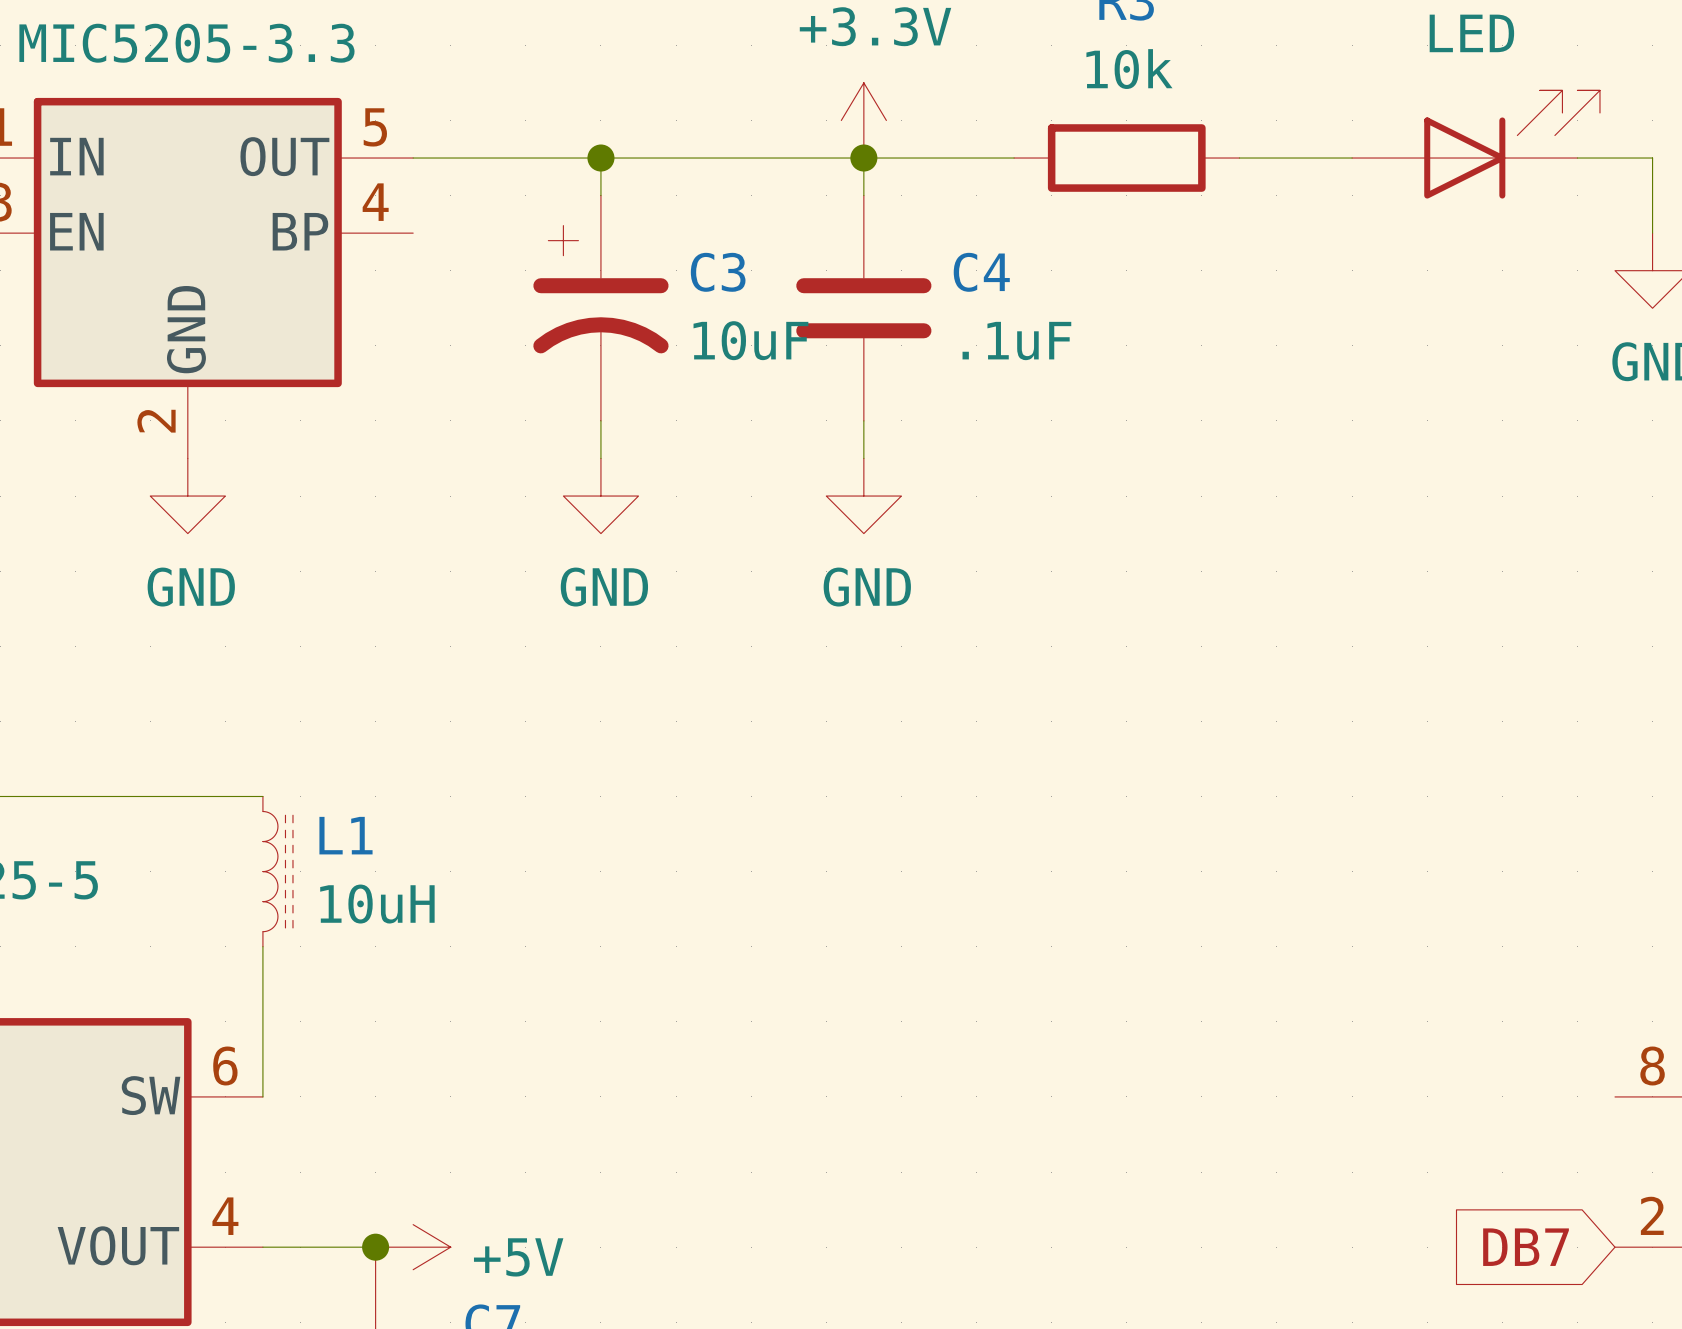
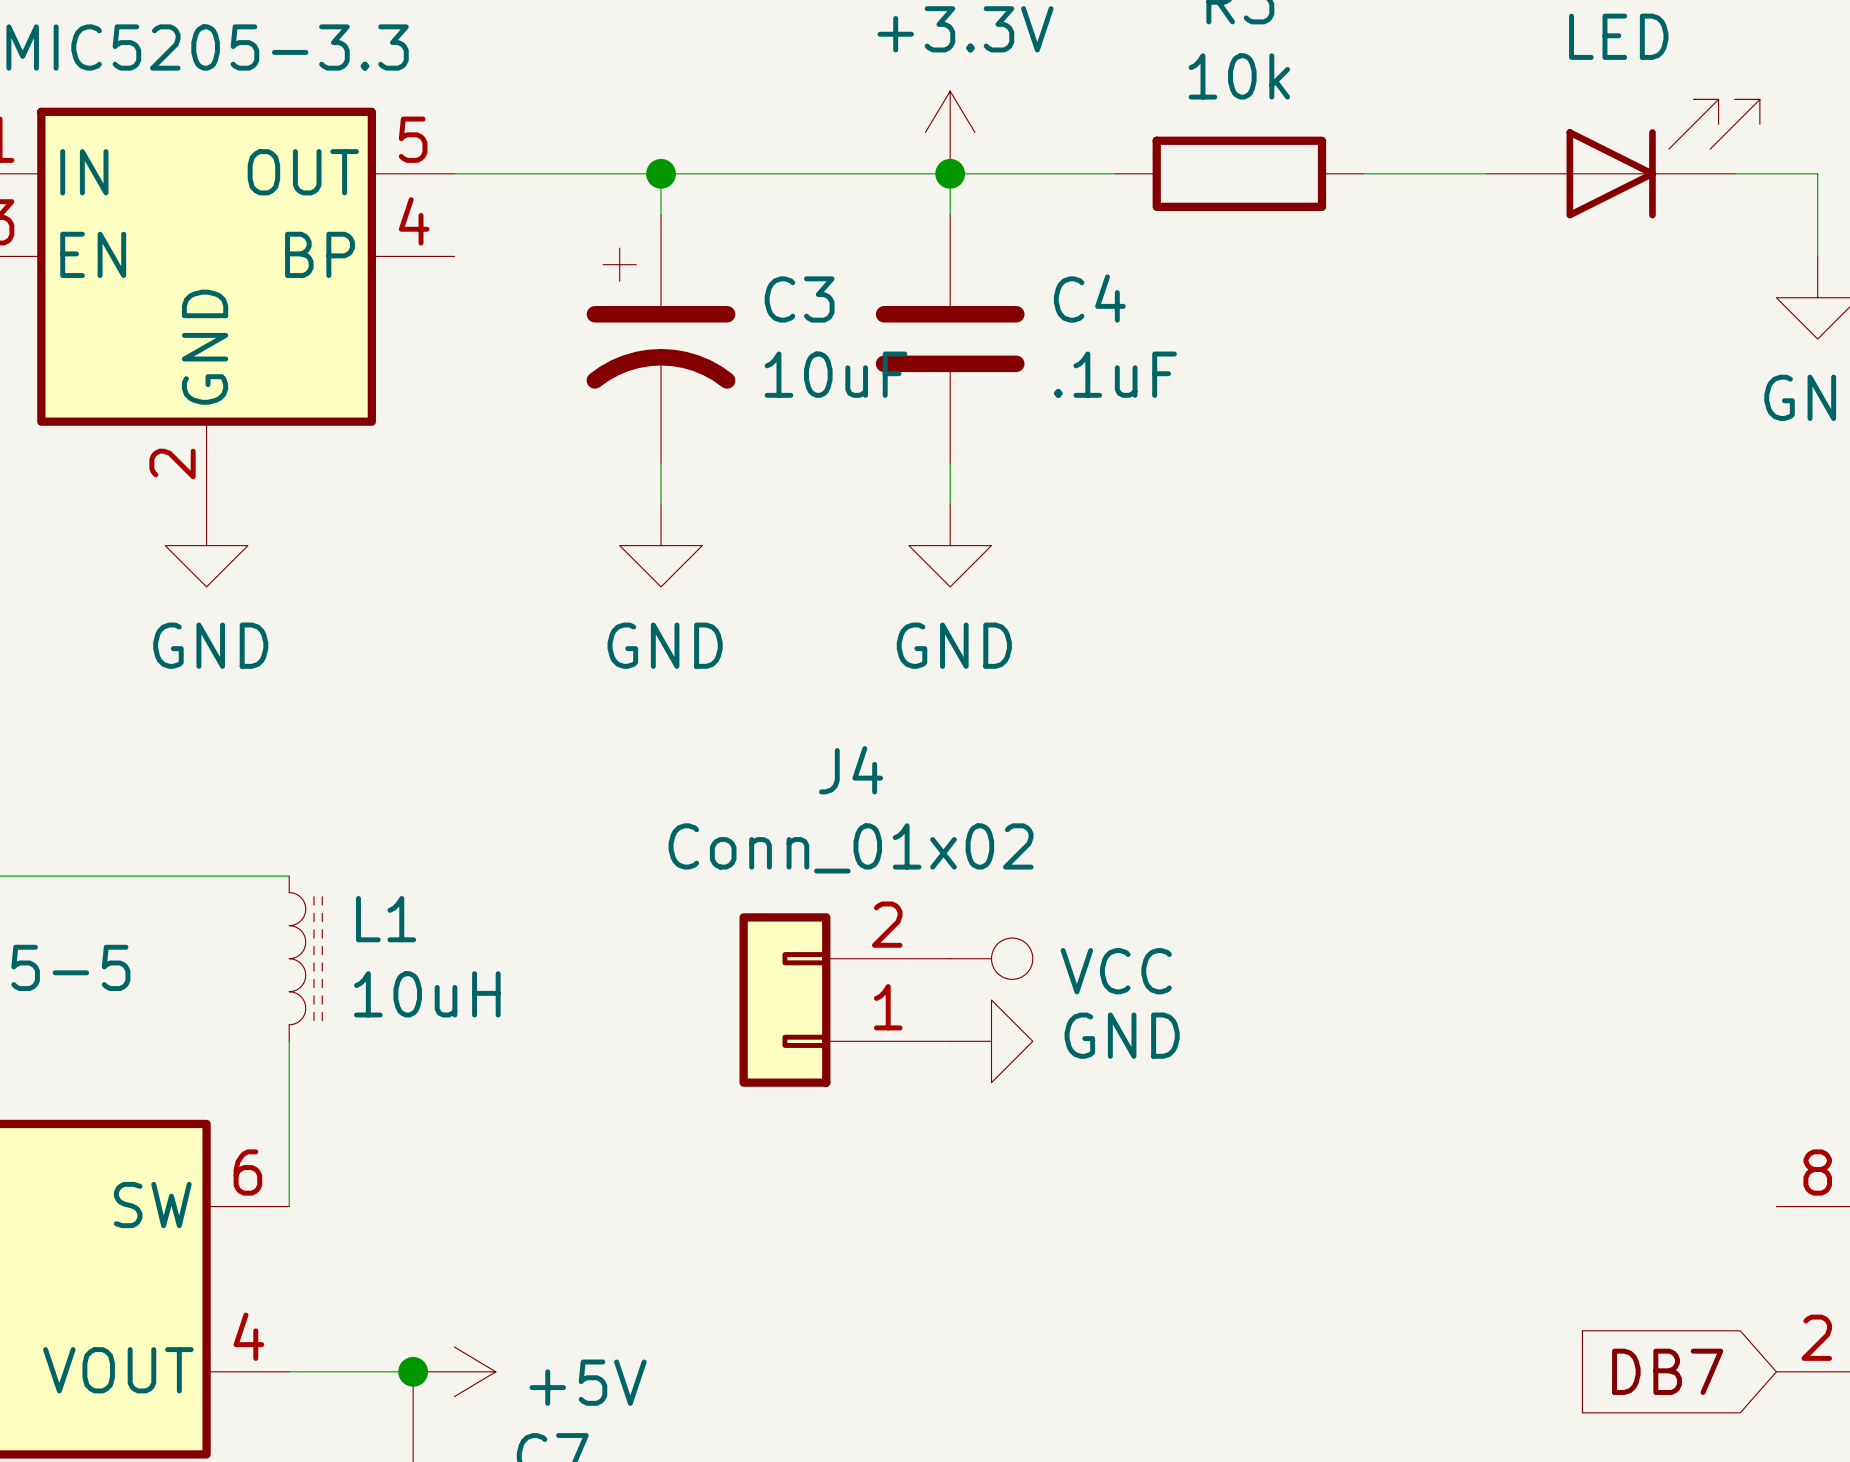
power symbol: none -> VCC (991, 958)
J4: none -> Conn_01x02 (844, 1000)
power symbol: none -> GND (991, 1041)

